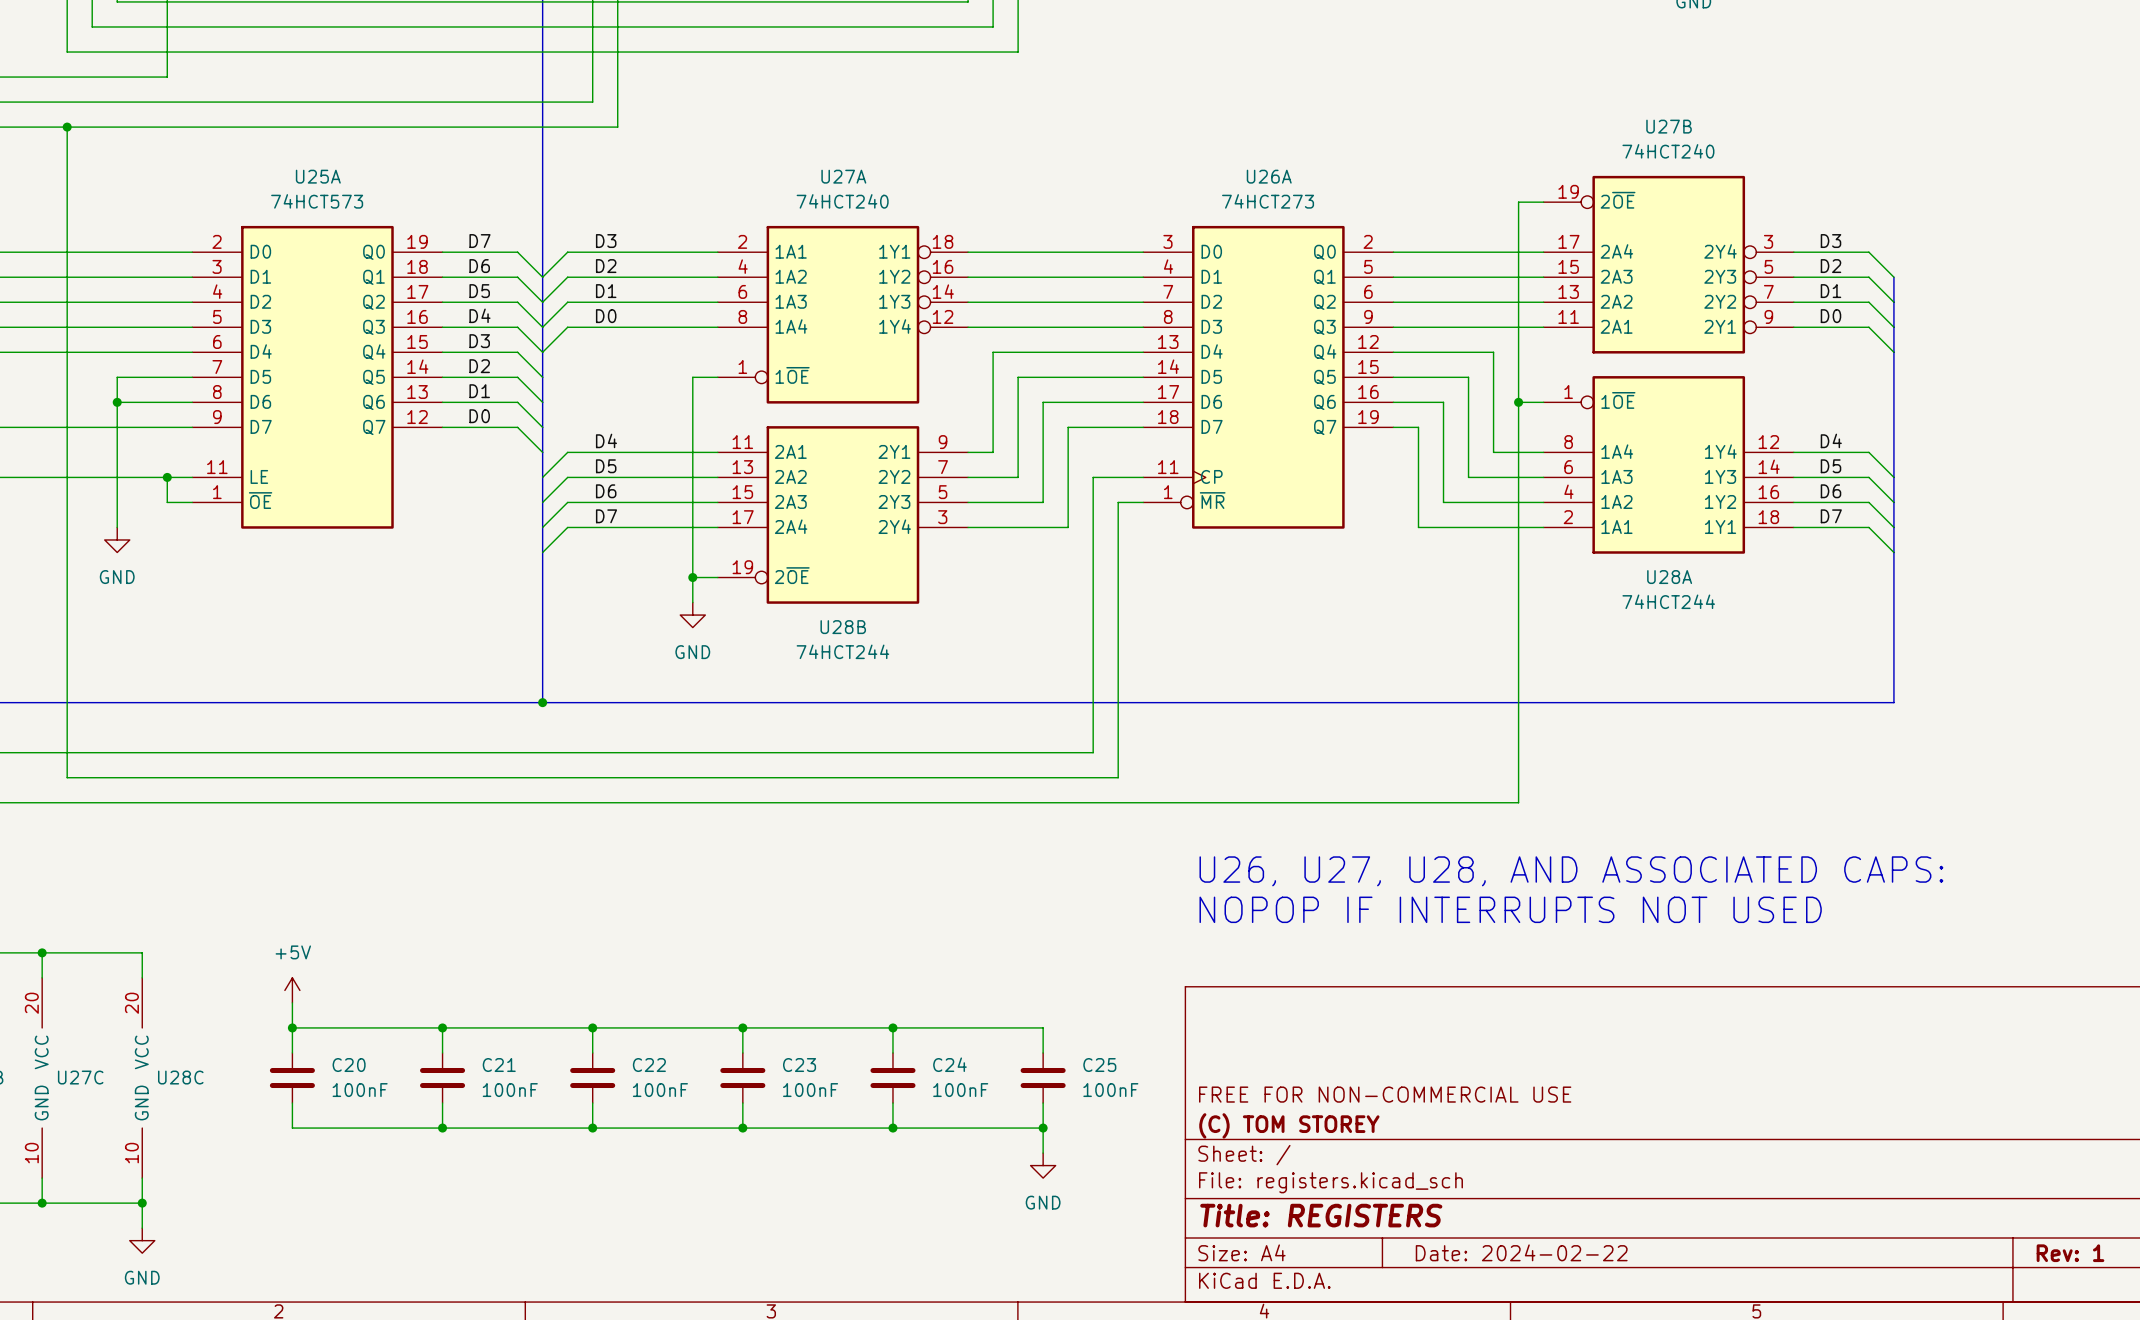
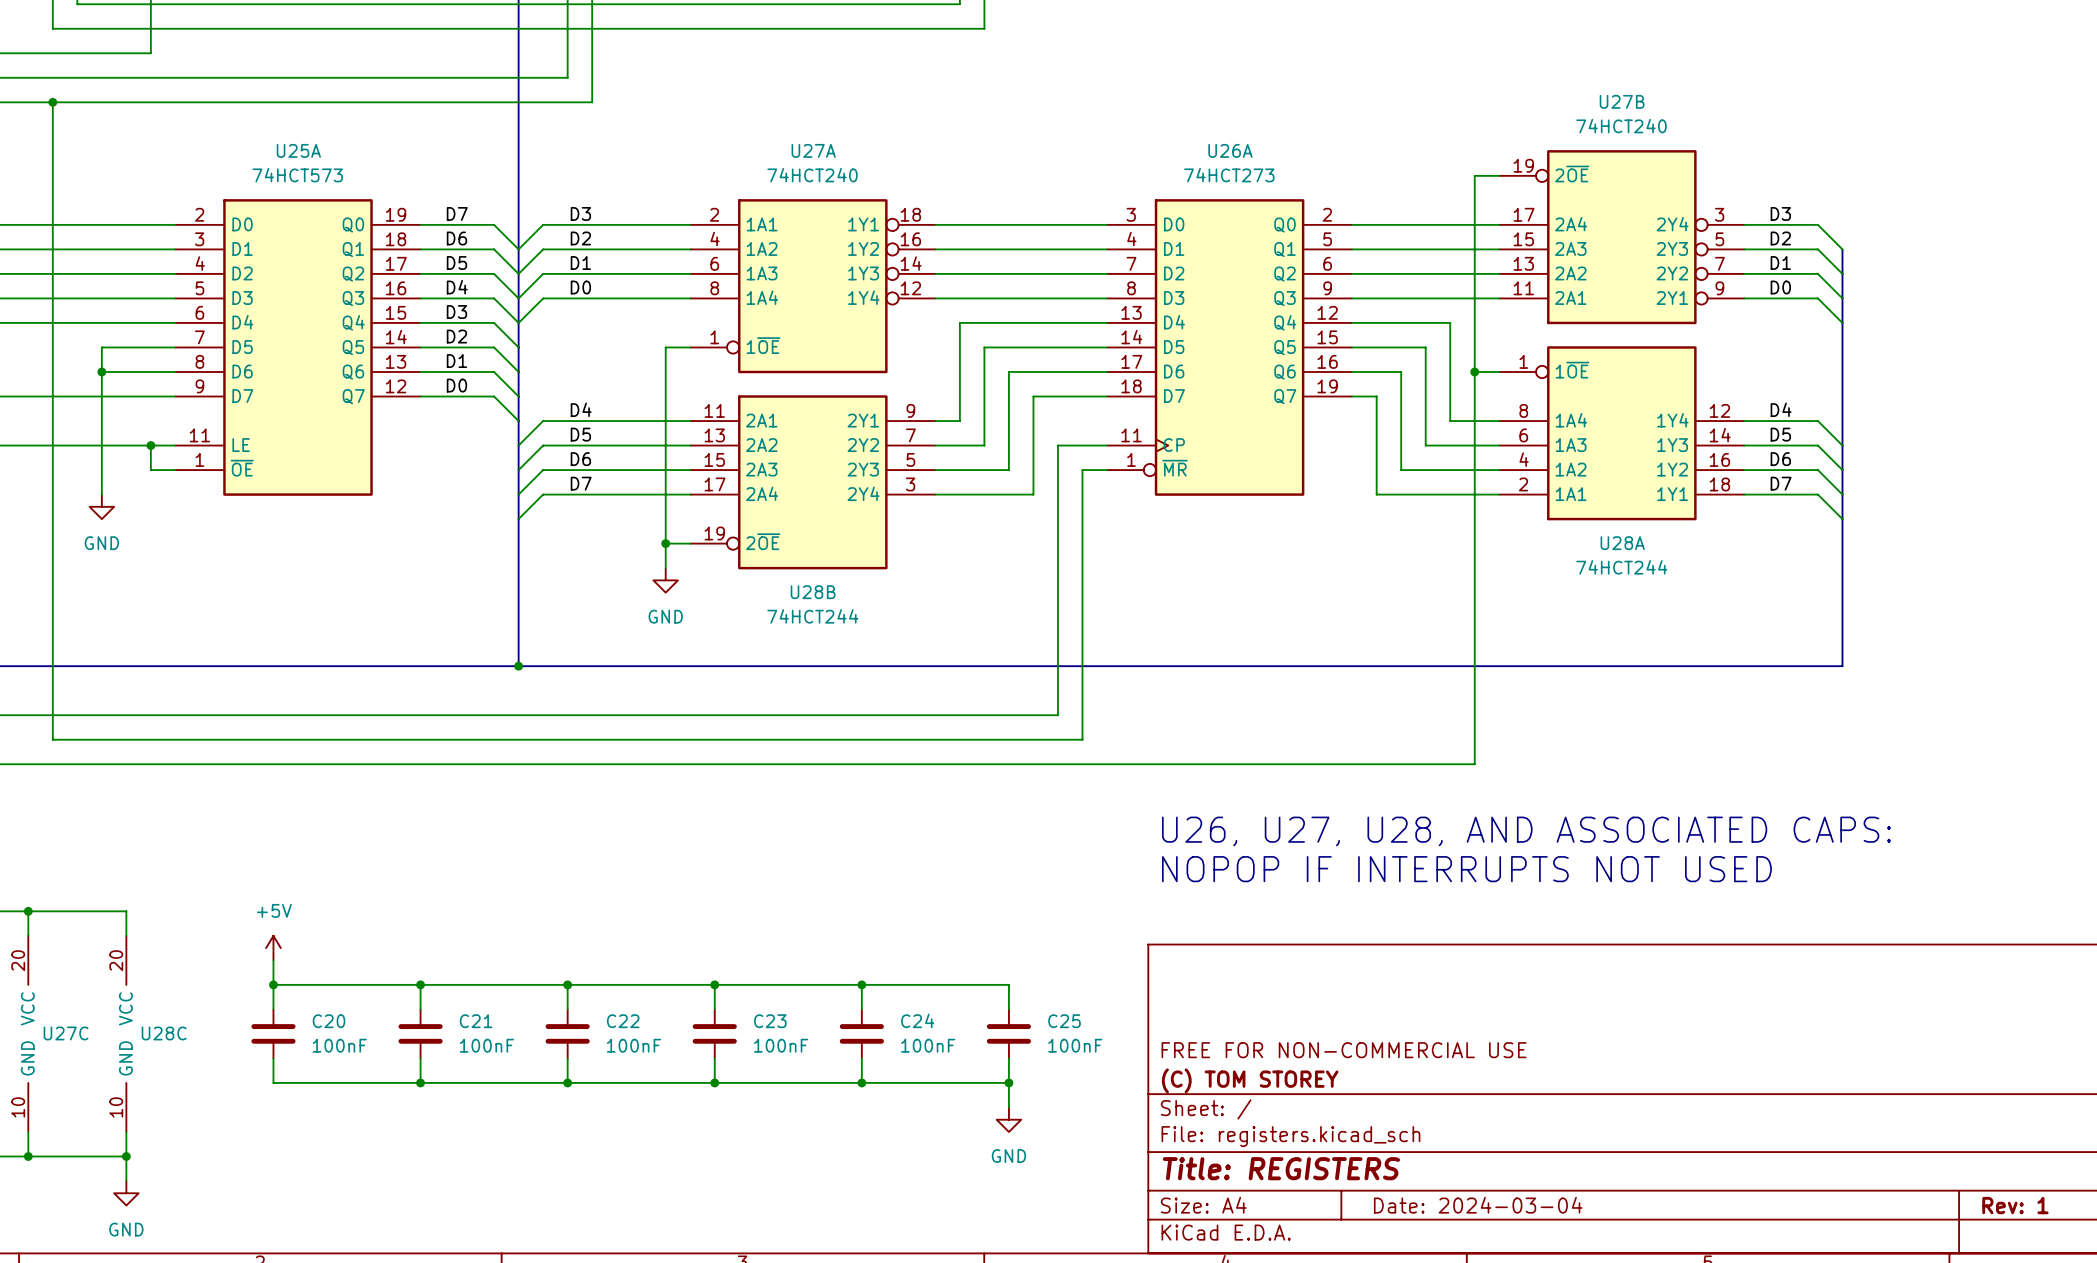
title block: Date: 2024-02-22 (1521, 1252) -> Date: 2024-03-04 (1478, 1205)

